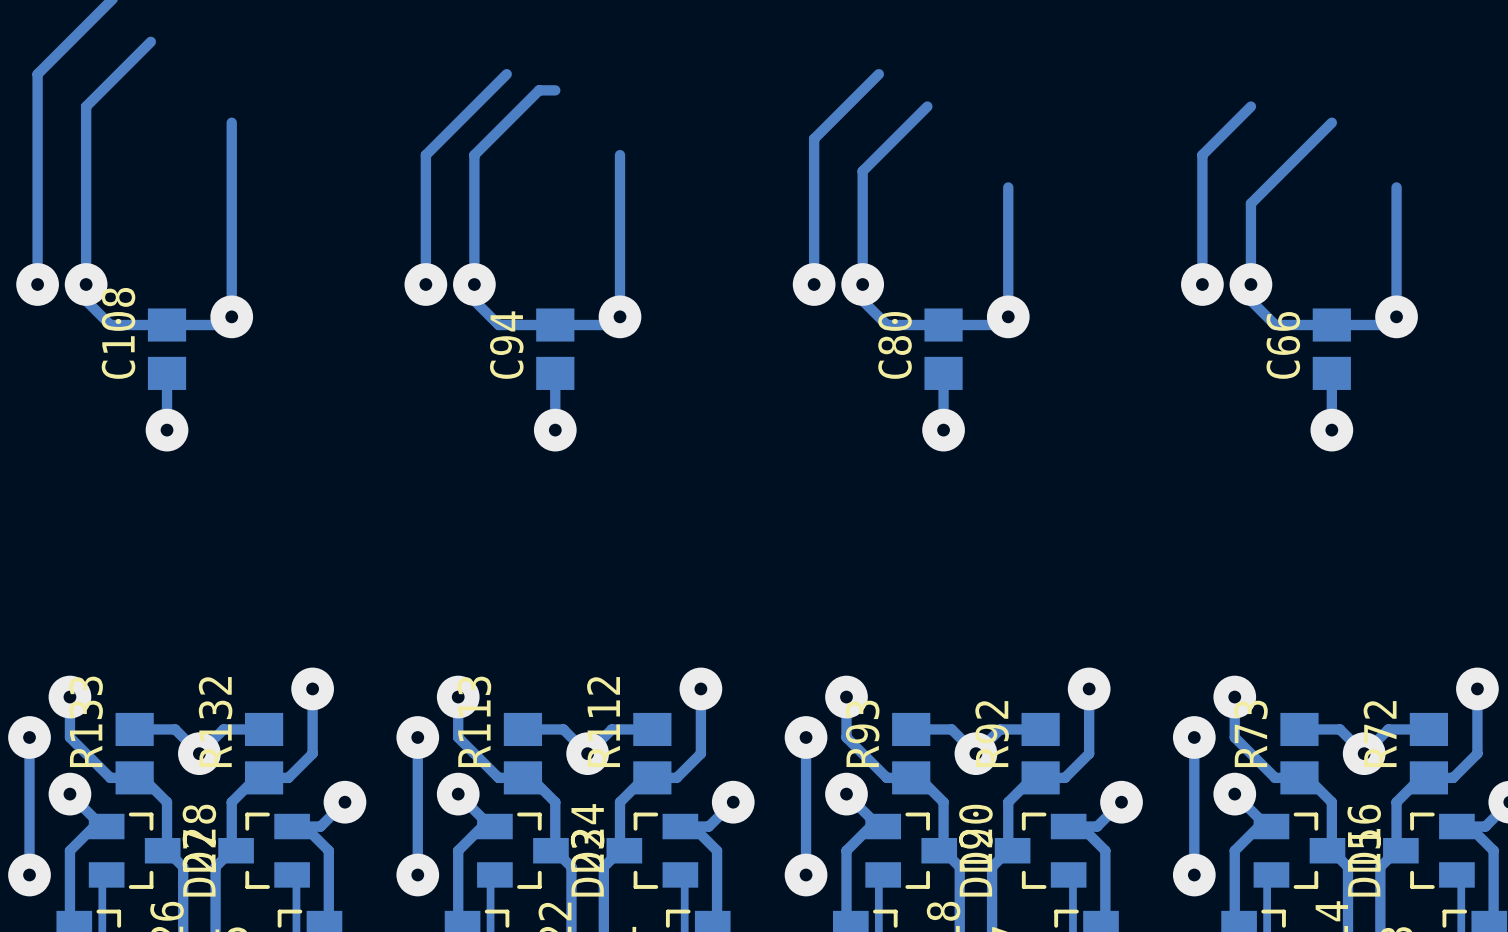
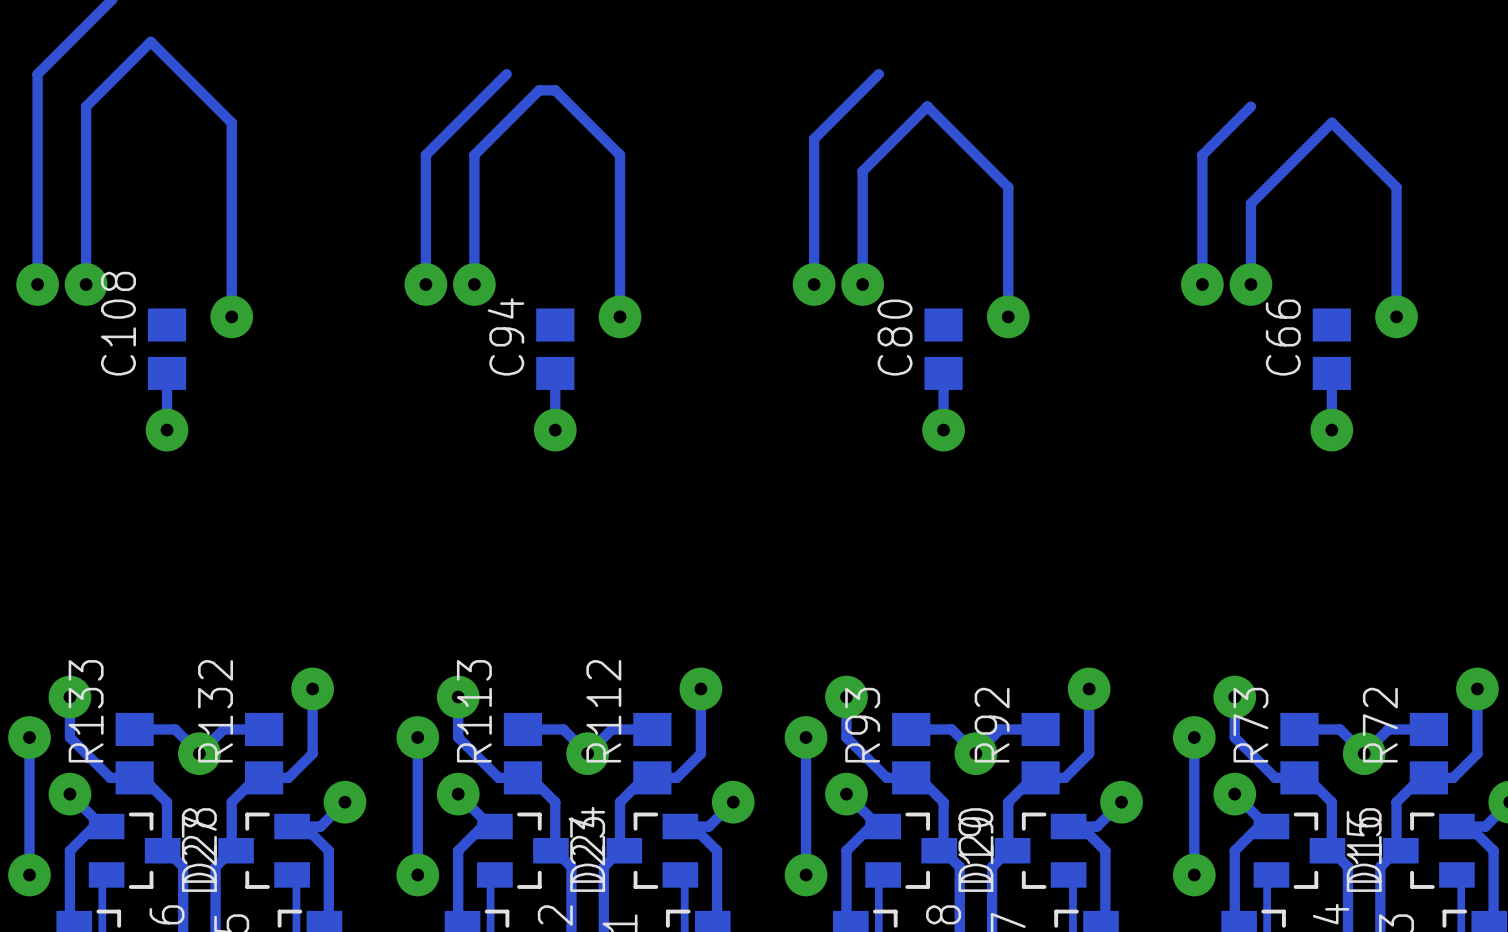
track: none -> (150, 41) (231, 122)
track: none -> (555, 90) (620, 155)
track: none -> (927, 106) (1008, 187)
track: none -> (1331, 122) (1396, 187)
track: (86, 284) (86, 300) (110, 325) (223, 325) (231, 316) -> none
track: (474, 284) (474, 300) (498, 325) (611, 325) (620, 316) -> none
track: (862, 284) (862, 300) (887, 325) (1000, 325) (1008, 316) -> none
track: (1250, 284) (1250, 300) (1275, 325) (1388, 325) (1396, 316) -> none

